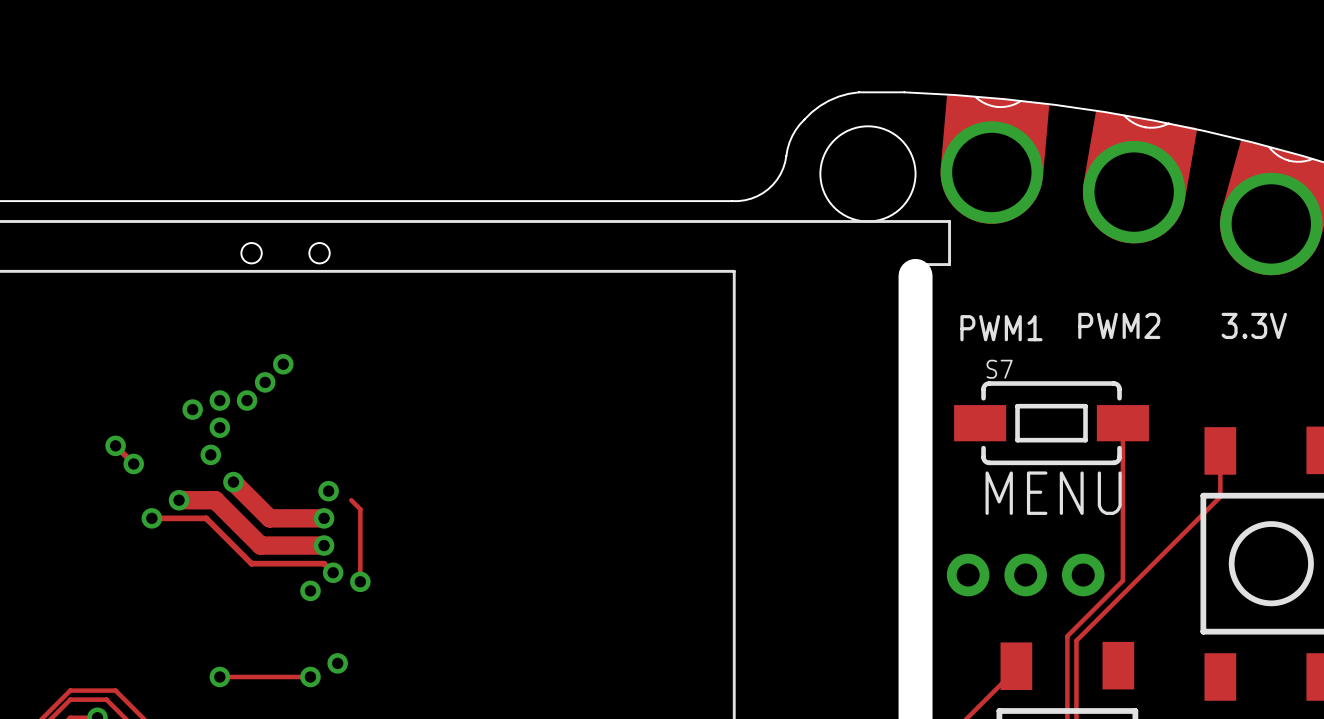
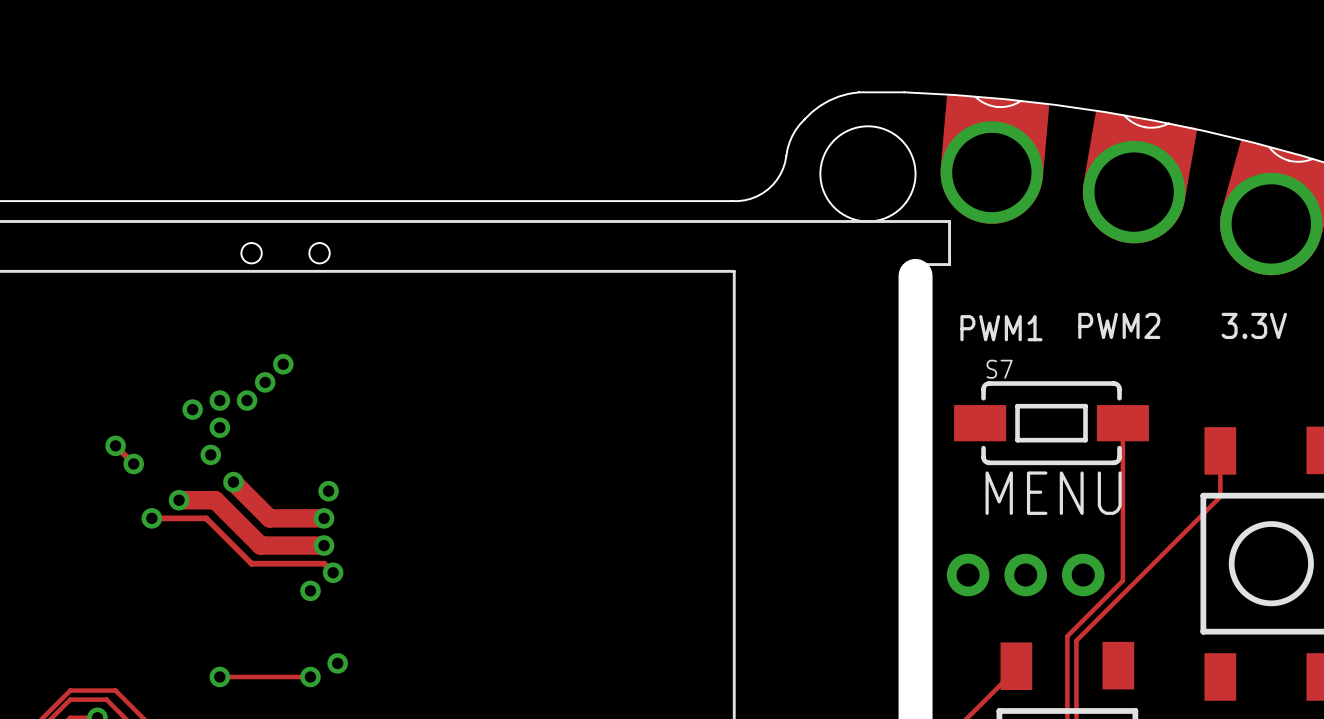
track: (351, 500) (360, 509) (360, 581) -> none
via: (360, 581) -> none

